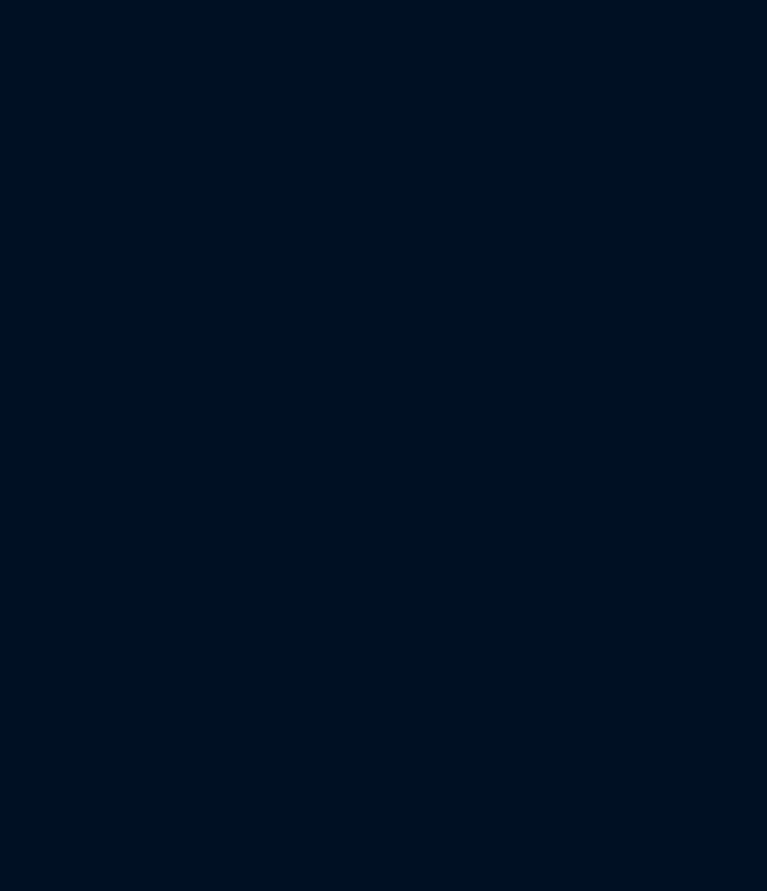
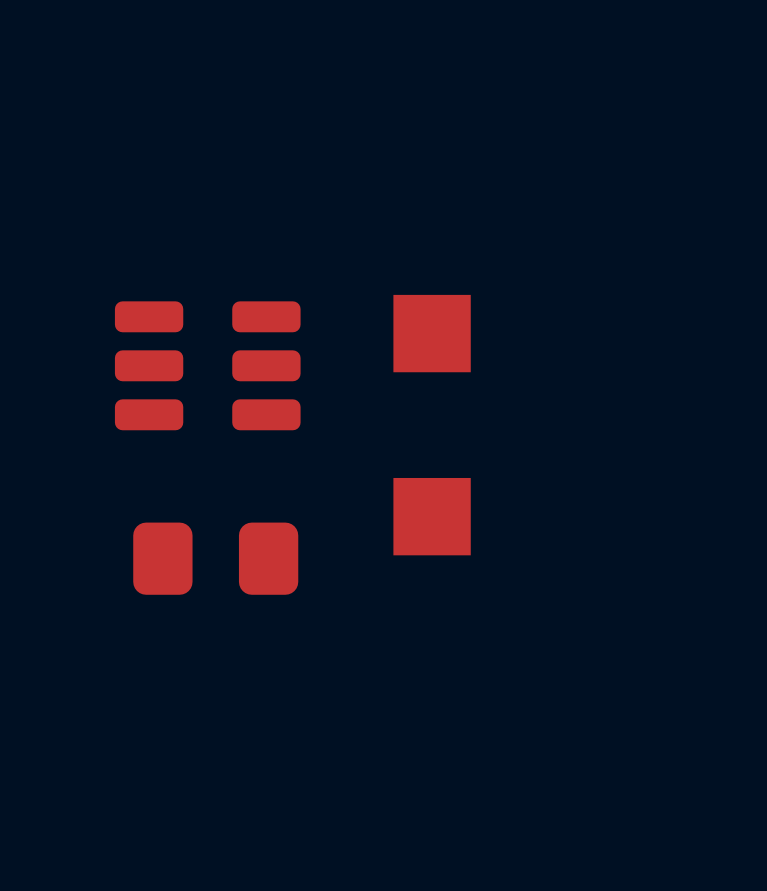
part: none -> (432, 333)
part: none -> (207, 365)
part: none -> (432, 516)
part: none -> (215, 558)

